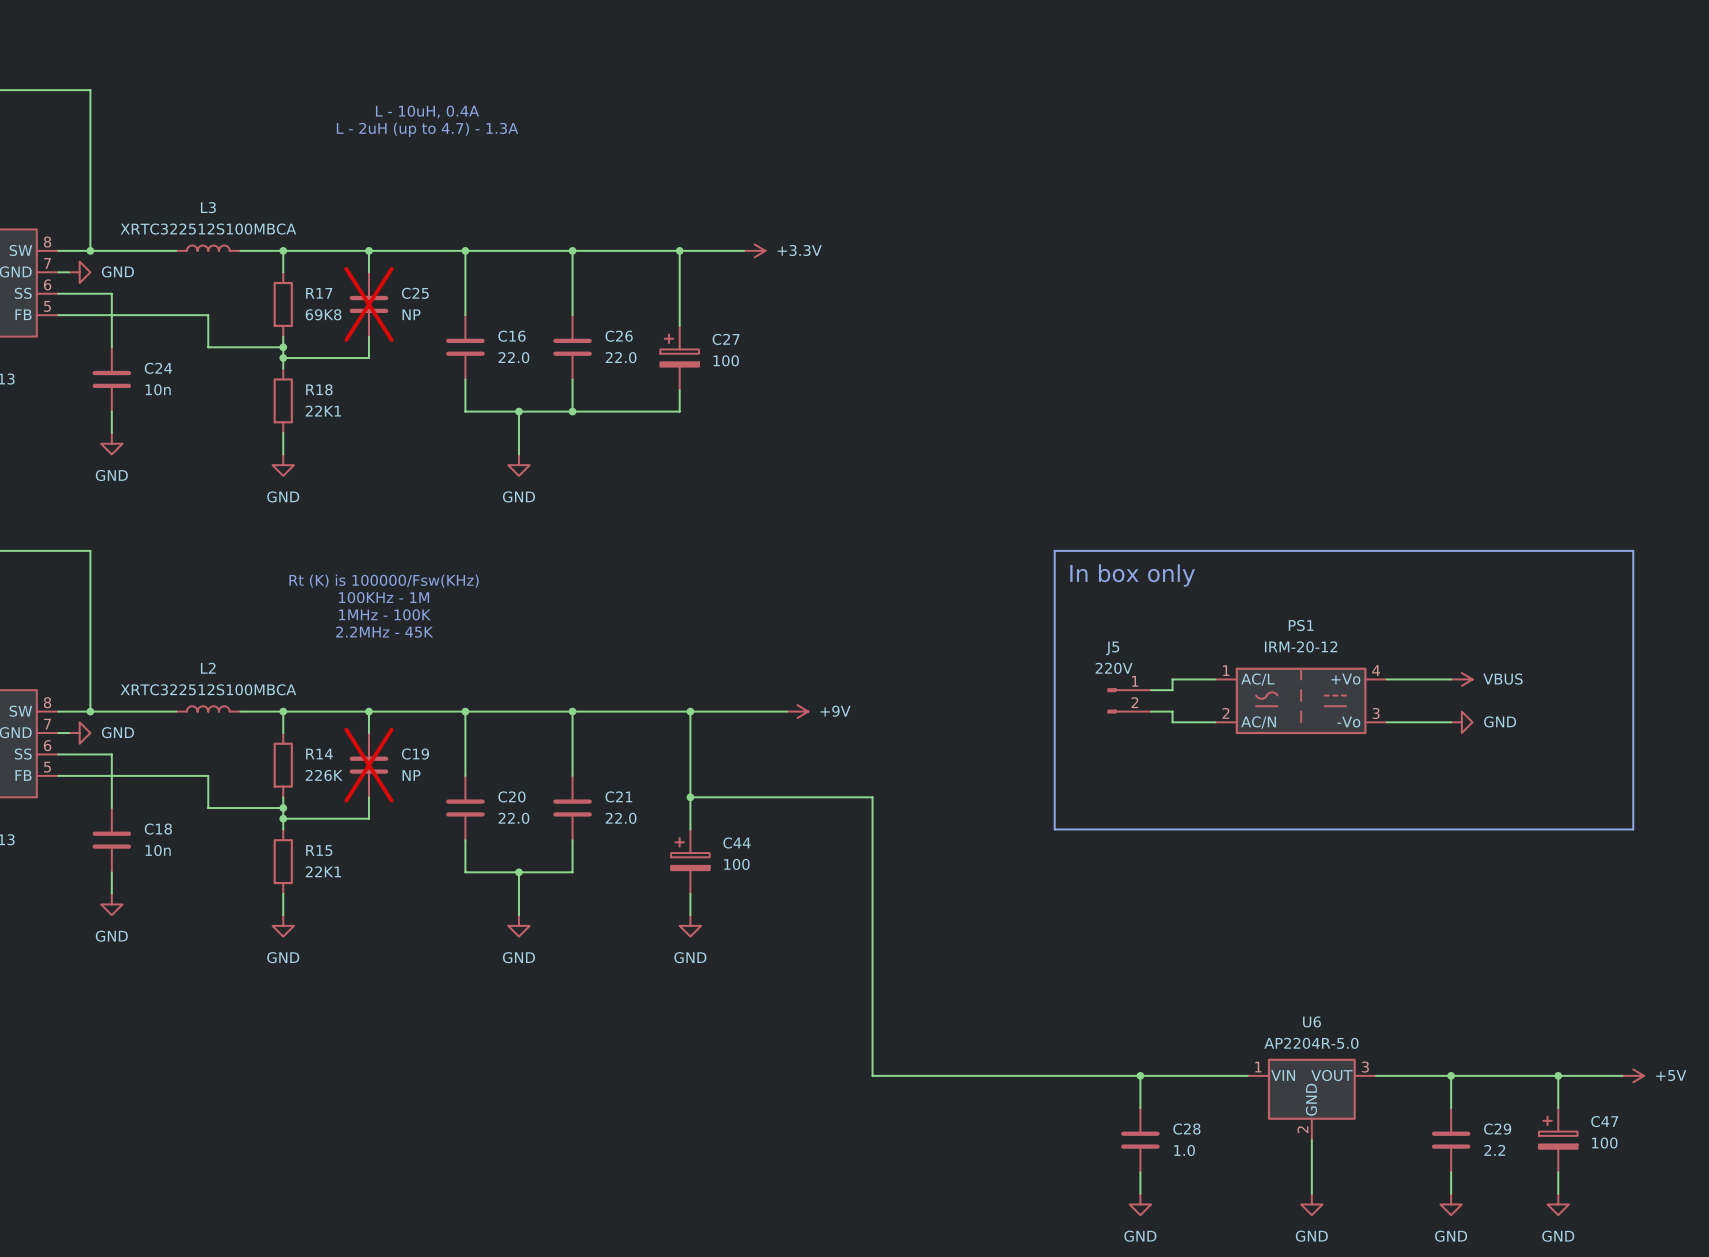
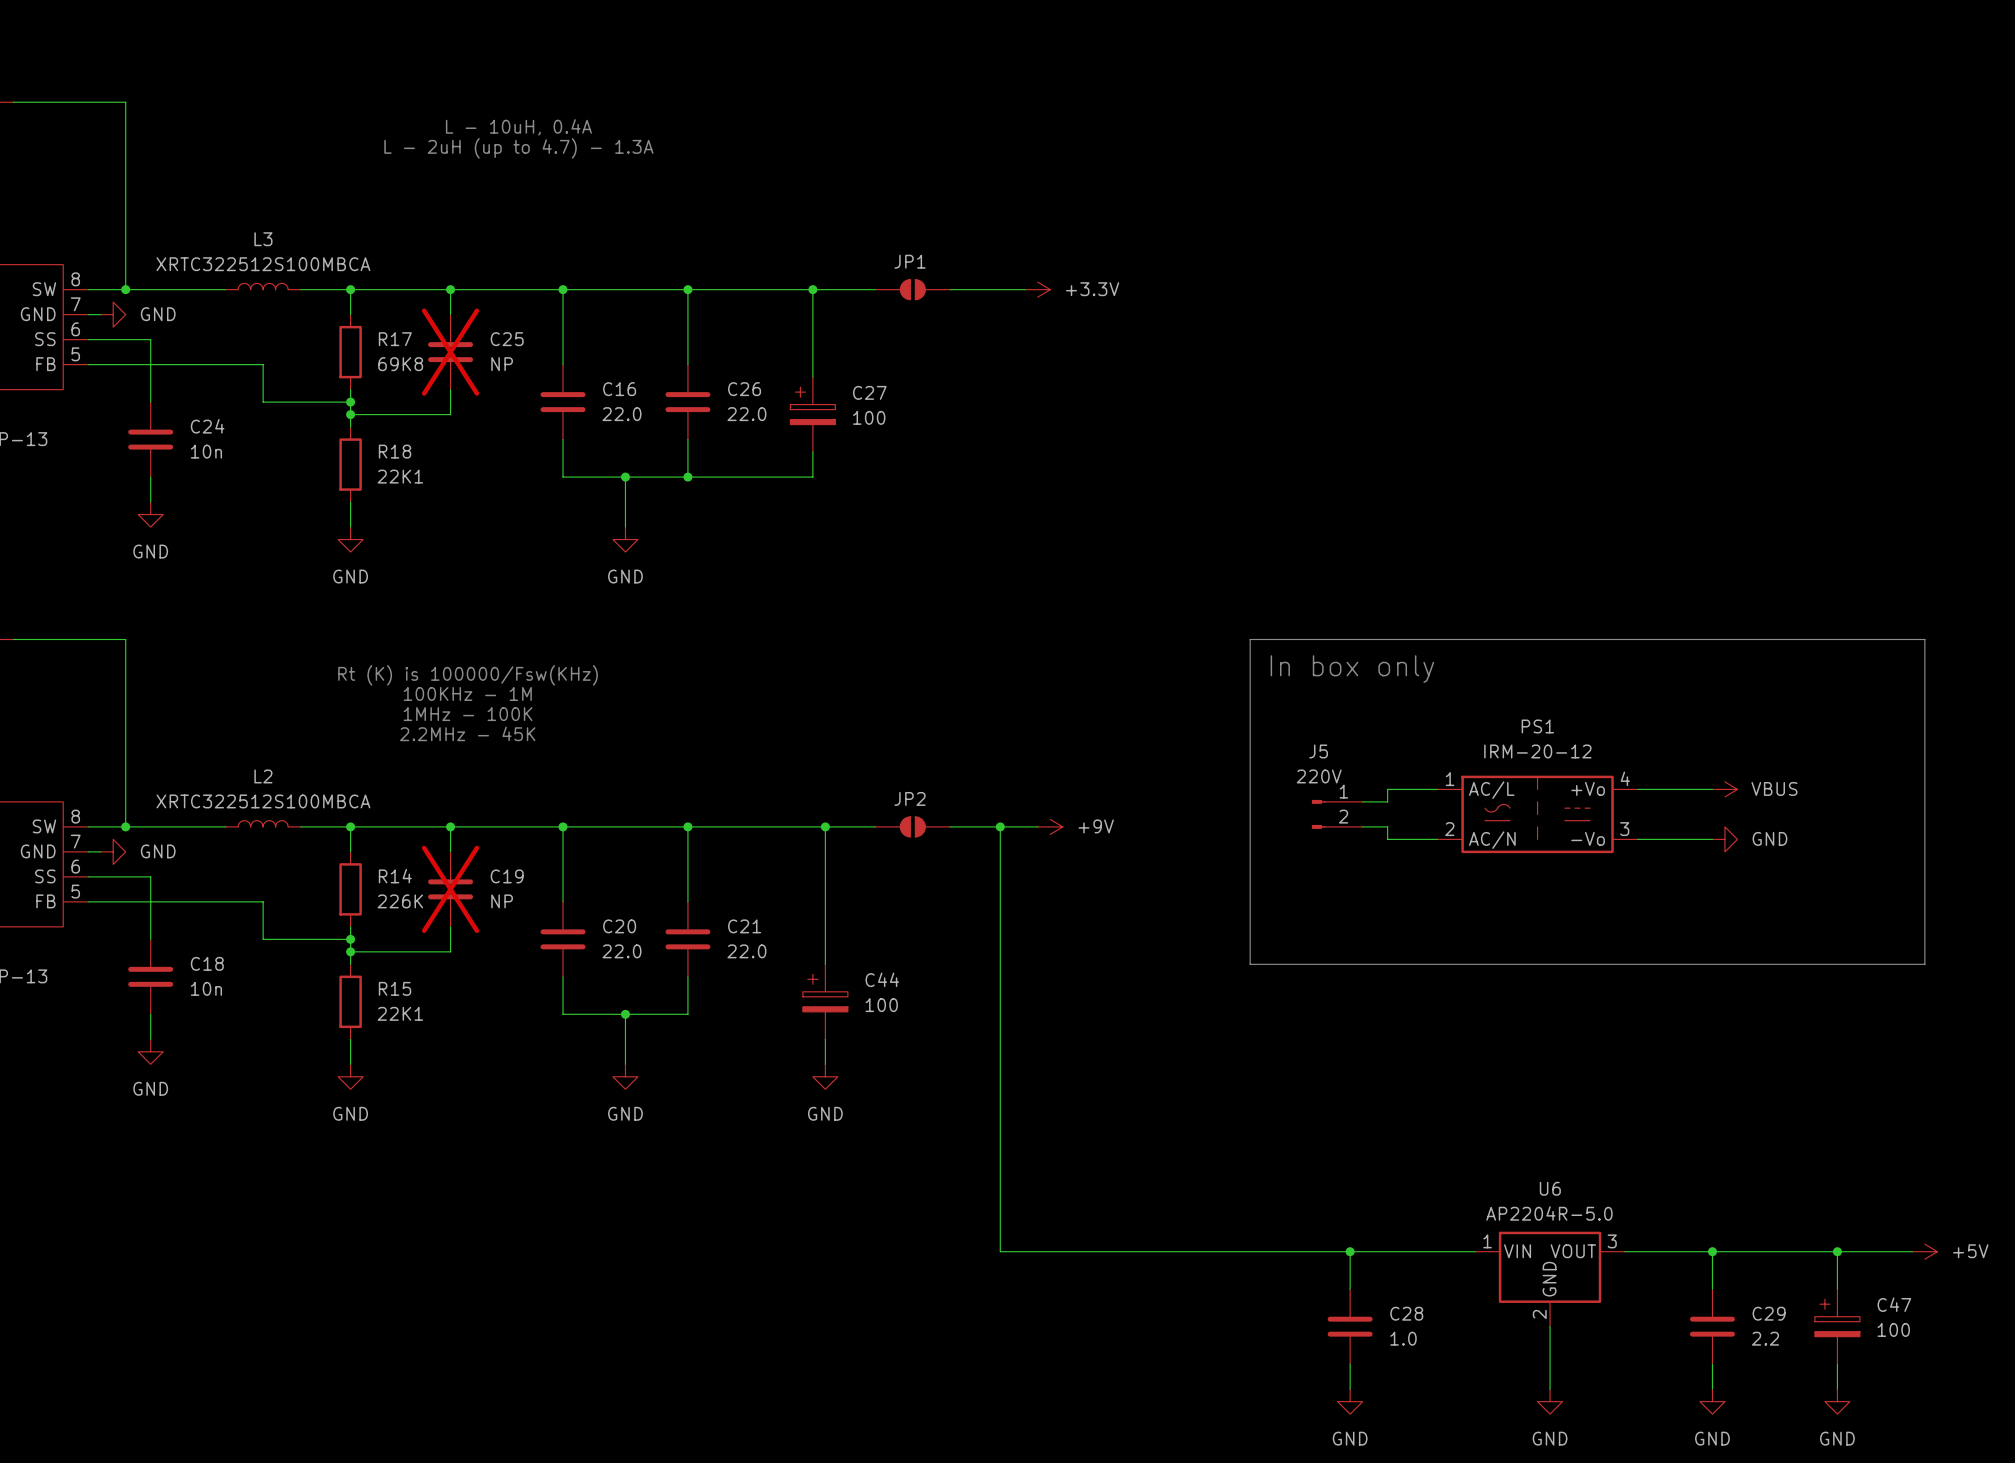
power symbol position: +3.3V (754, 250) -> +3.3V (1037, 289)
JP1: none -> (912, 289)
wire: none -> (950, 289) (1025, 289)
JP2: none -> (912, 826)
wire: none -> (950, 826) (1037, 826)
power symbol position: +9V (797, 711) -> +9V (1050, 826)
junction: none -> (1000, 826)
wire: (690, 797) (872, 797) (872, 1075) -> (1000, 826) (1000, 1251) (1037, 1251)
junction: (690, 797) -> none

